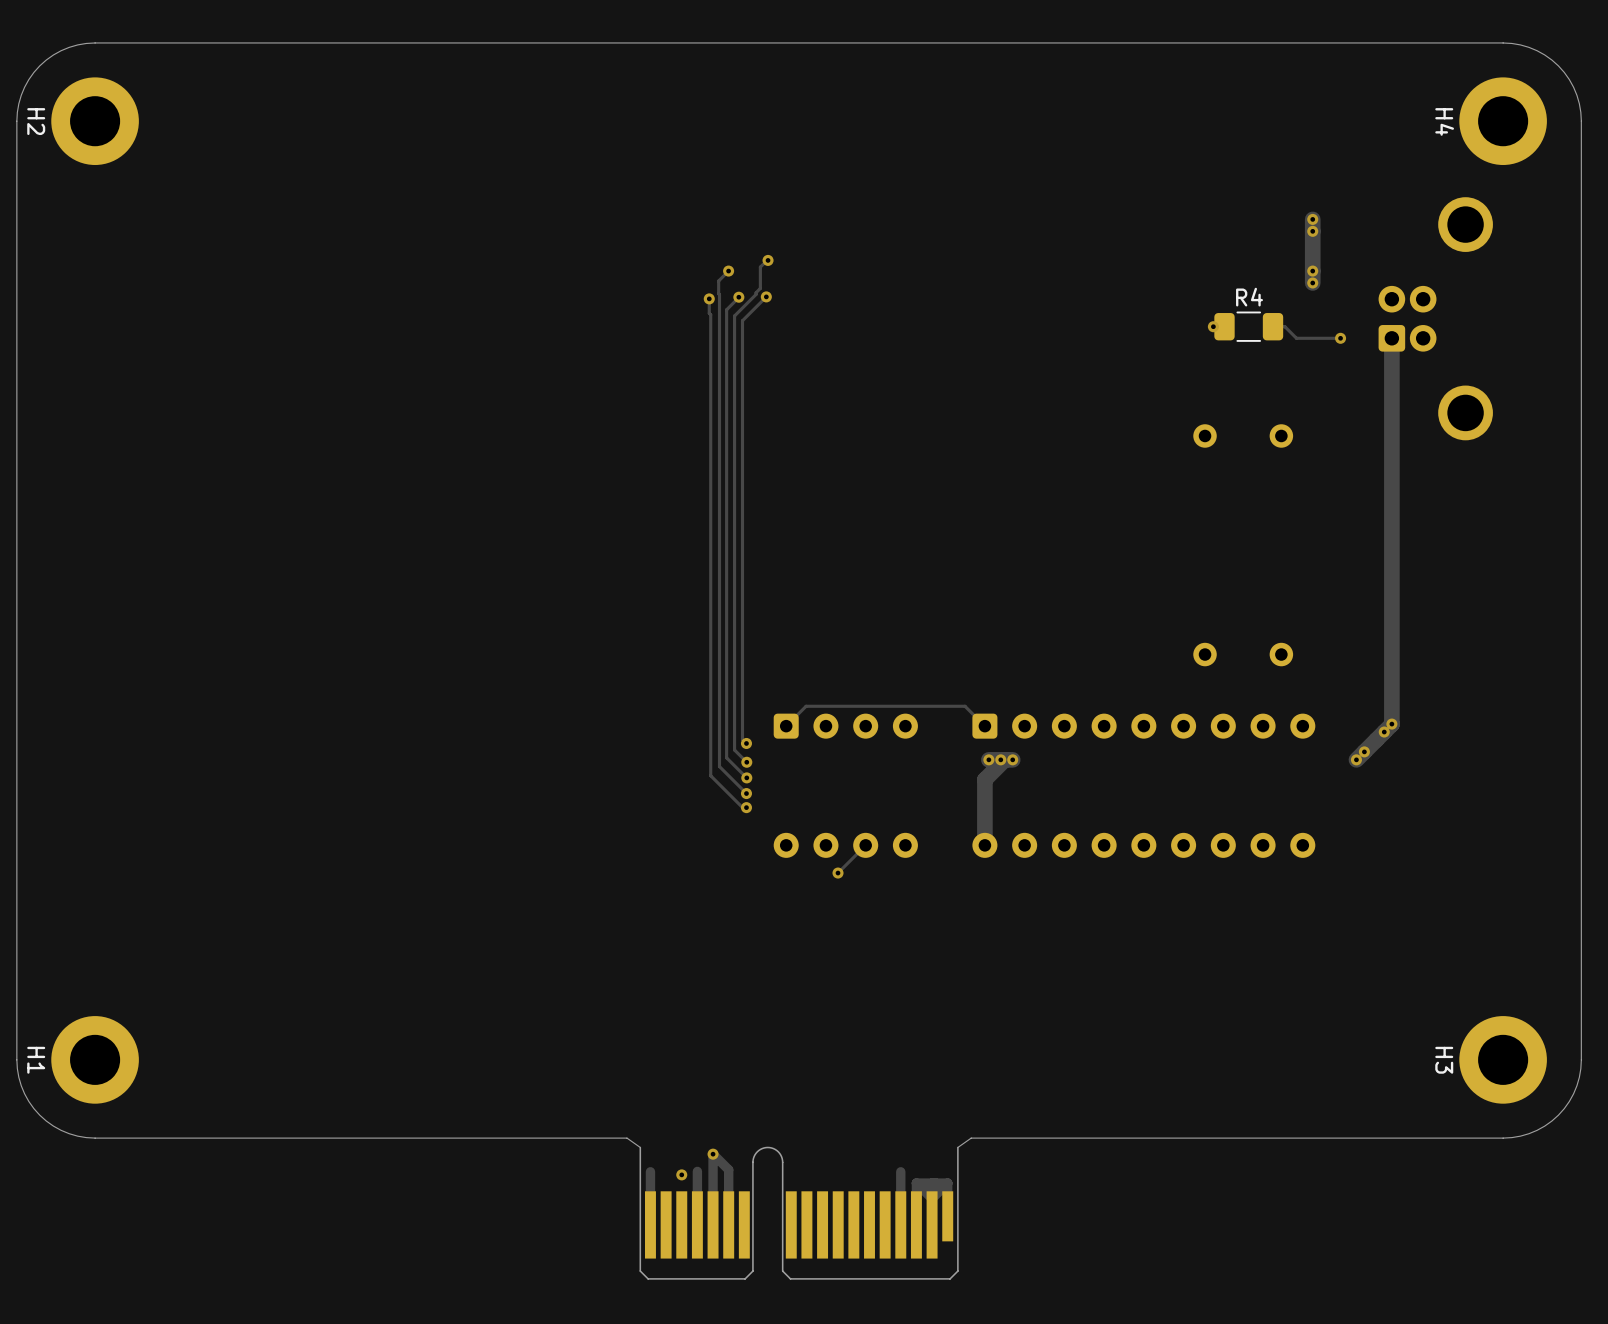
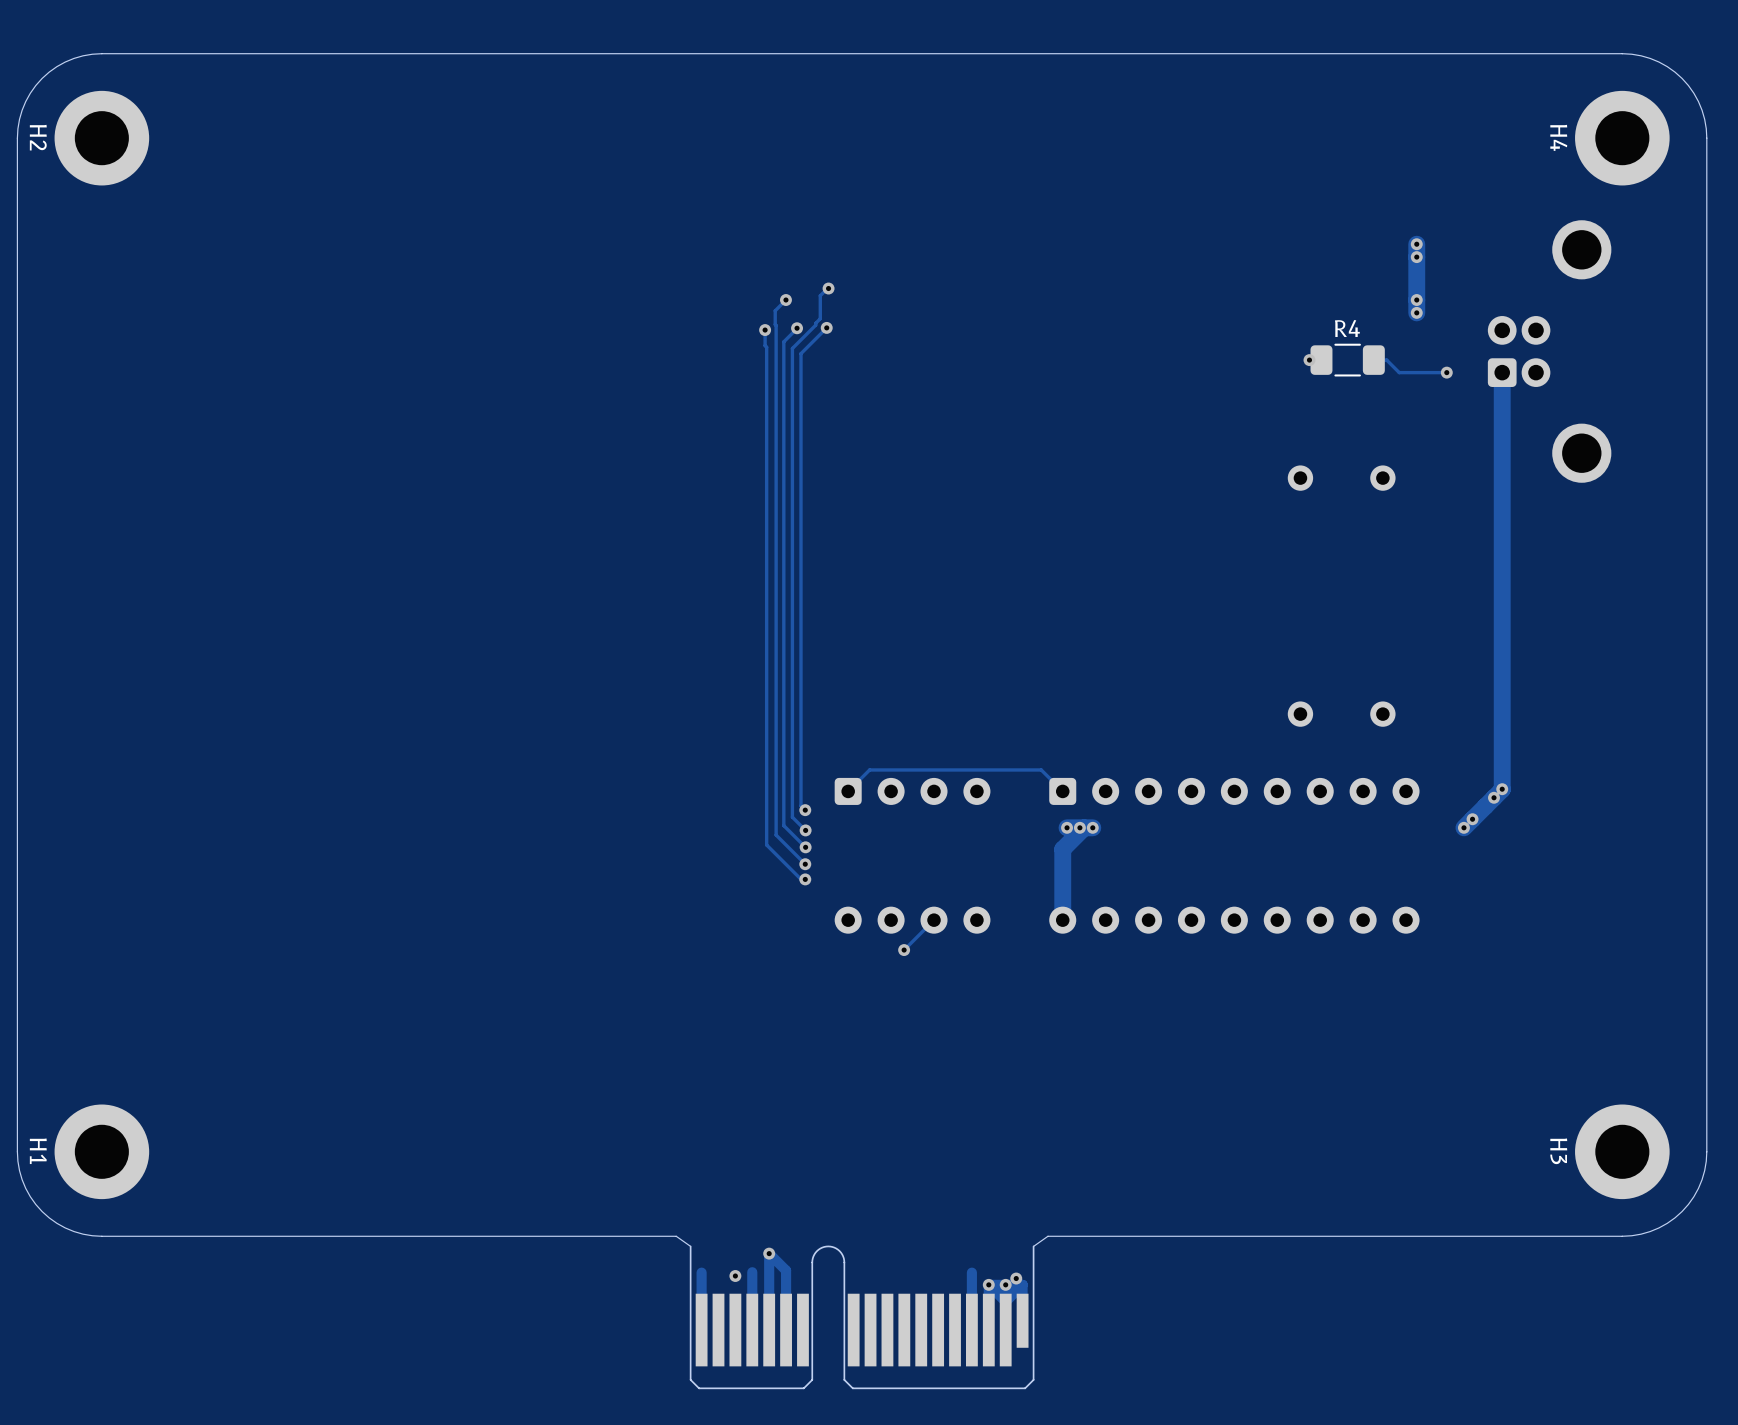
via: none -> (1016, 1278)
via: none -> (988, 1284)
via: none -> (1005, 1284)

